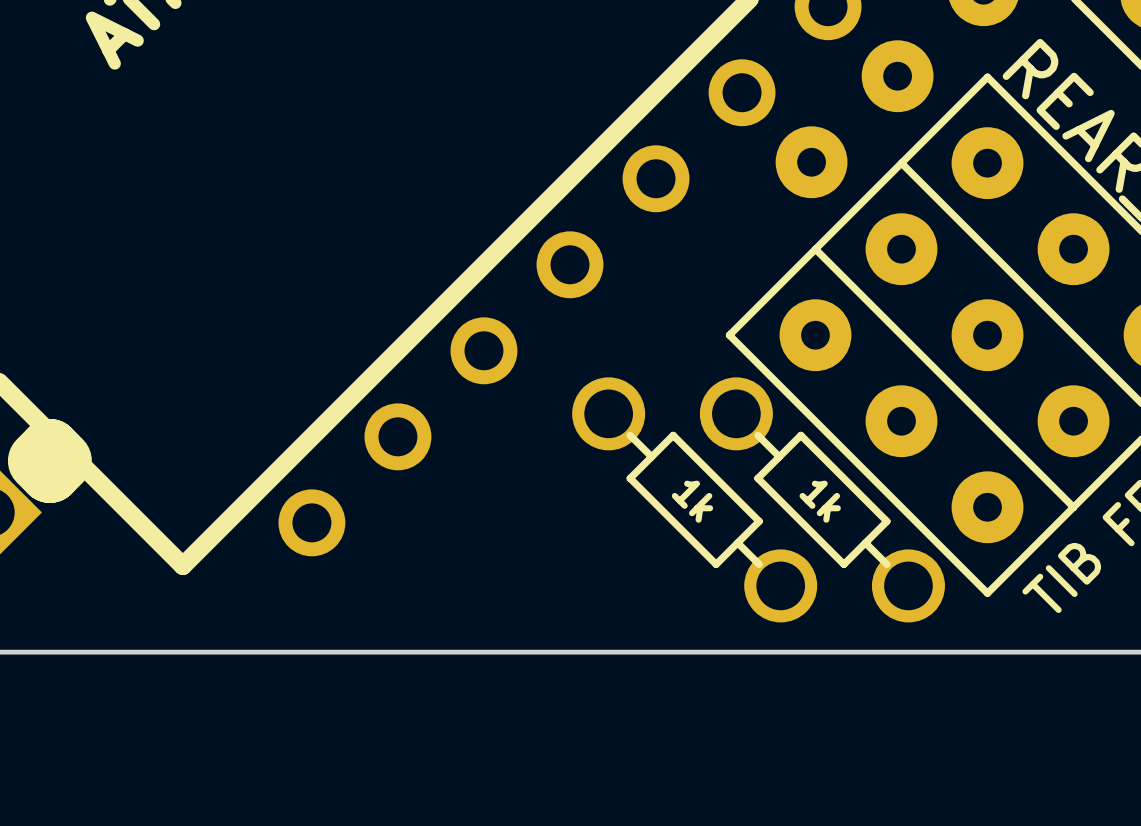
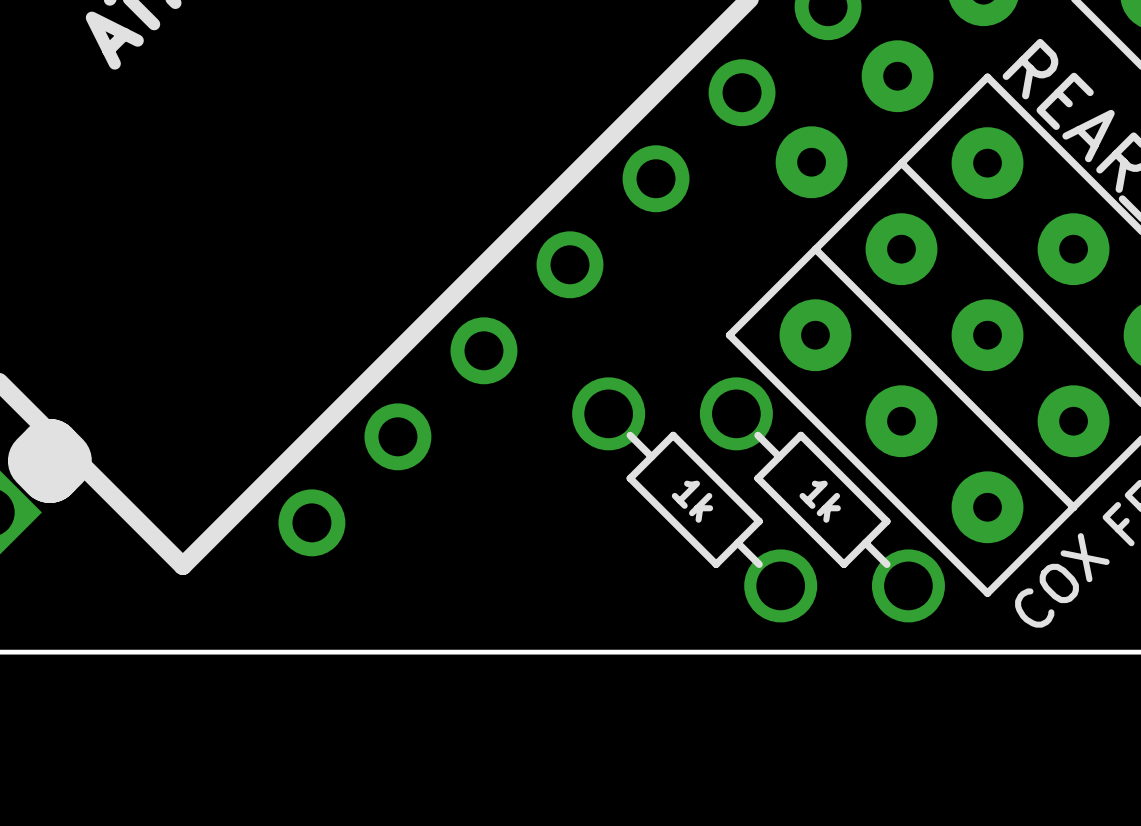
part text: TIB (1061, 577) -> none
part text: none -> COX (1062, 580)

